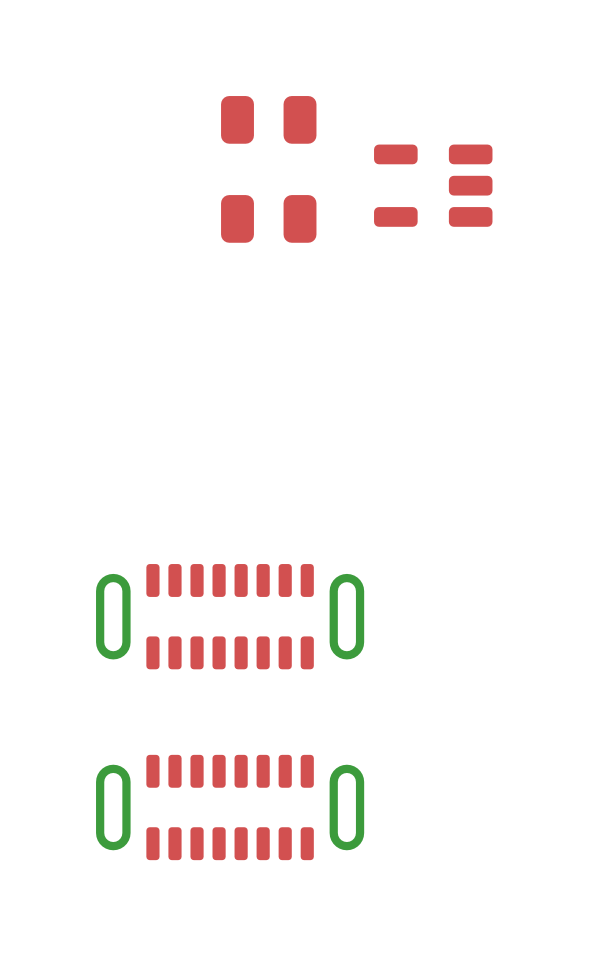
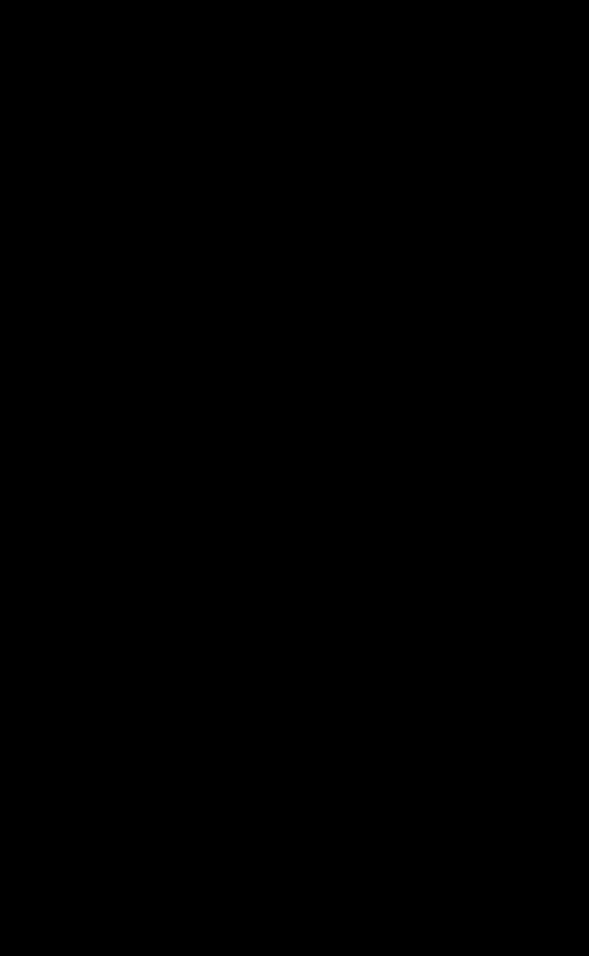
part: (268, 119) -> none
part: (433, 185) -> none
part: (268, 218) -> none
part: (230, 616) -> none
part: (230, 807) -> none

